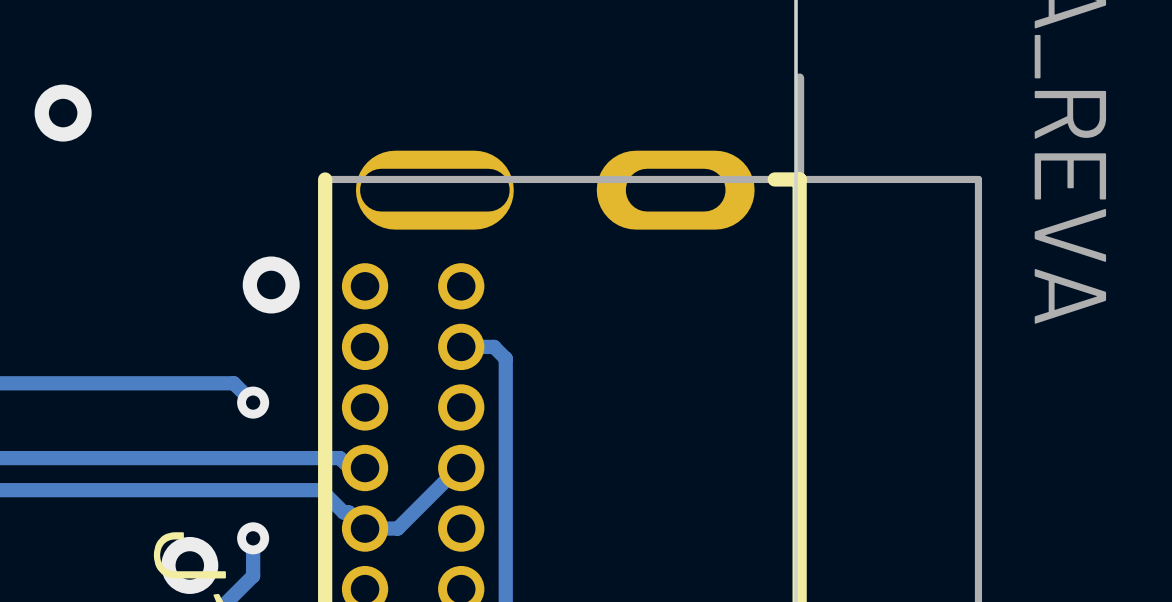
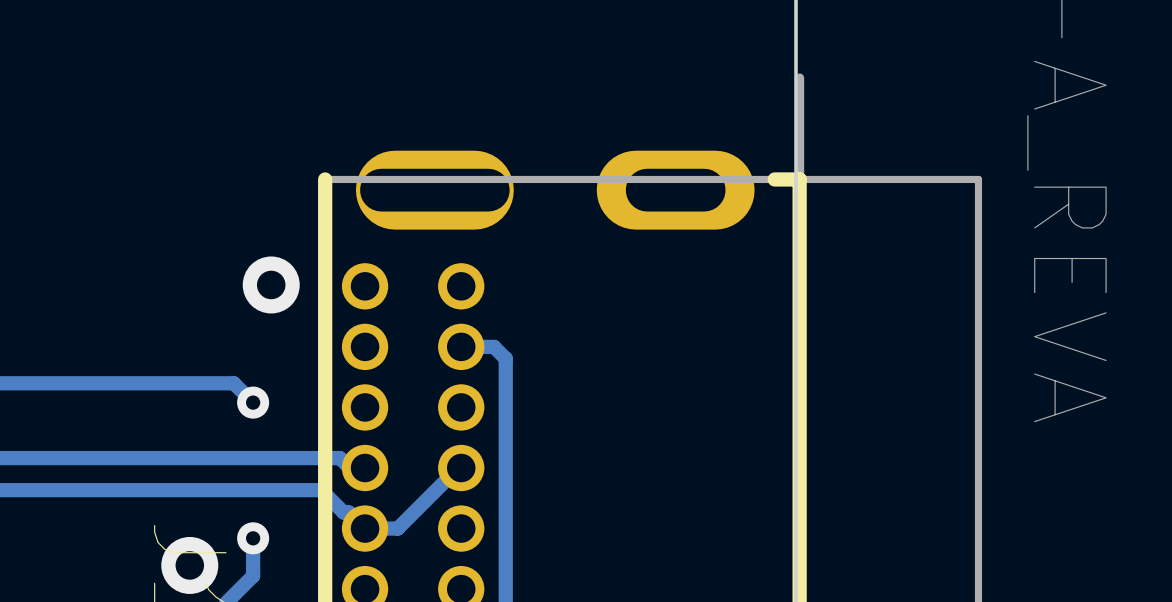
via: (63, 113) -> none

